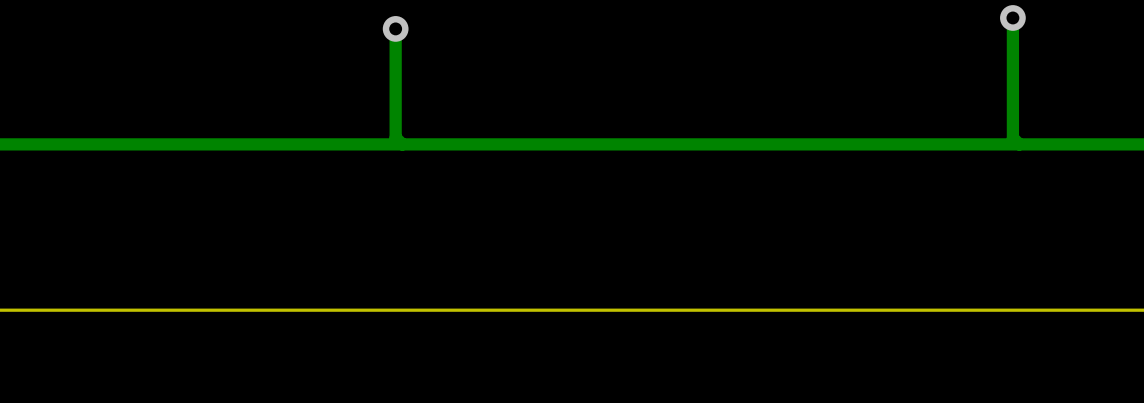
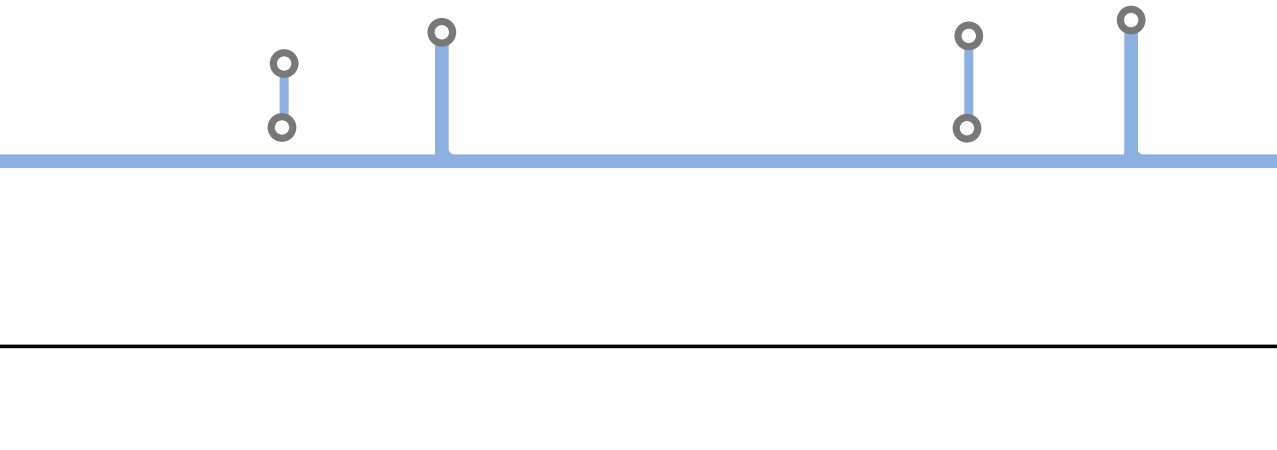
track: none -> (968, 35) (968, 126) (966, 128)
via: none -> (968, 35)
track: none -> (284, 63) (284, 125) (281, 127)
via: none -> (284, 63)
via: none -> (281, 127)
via: none -> (966, 128)

